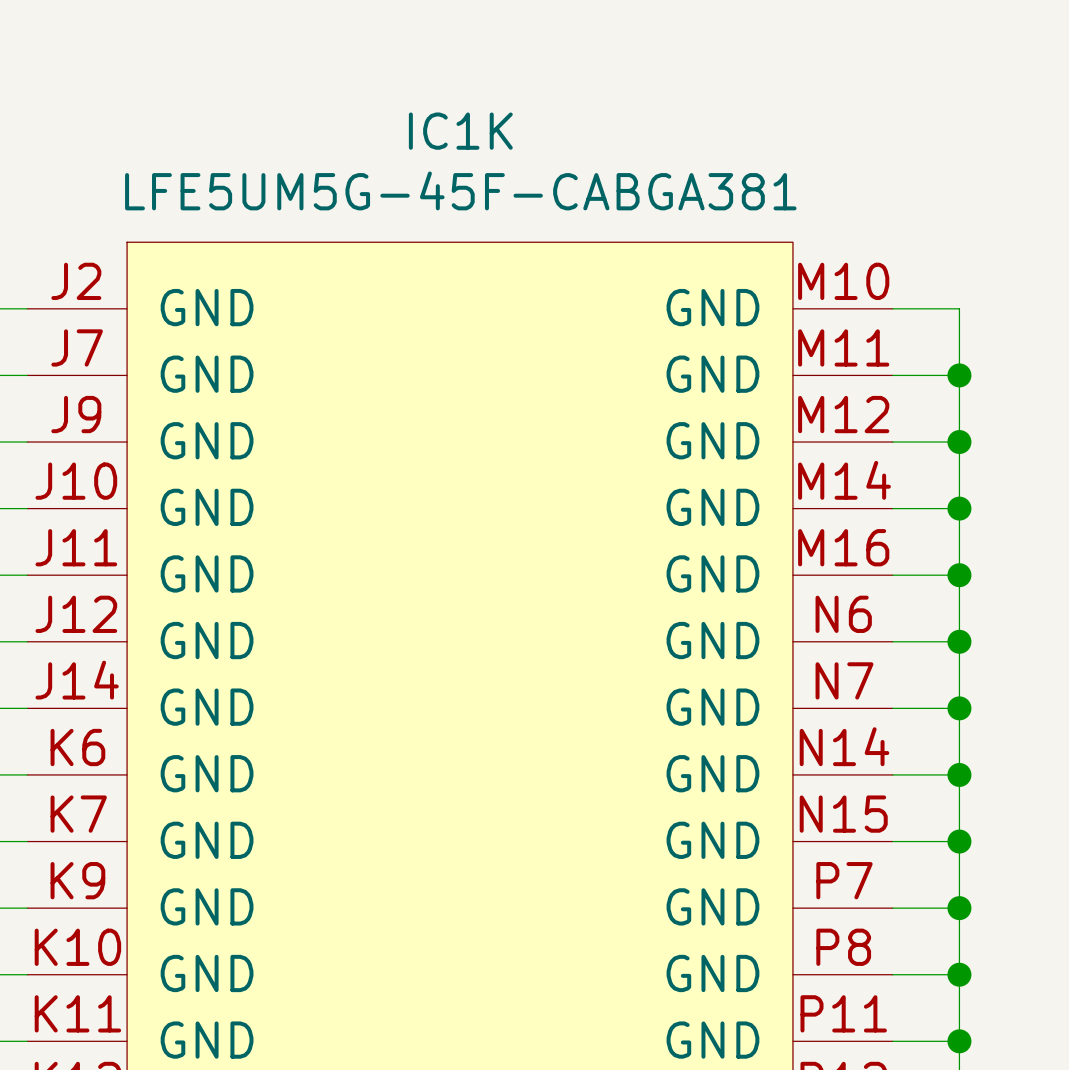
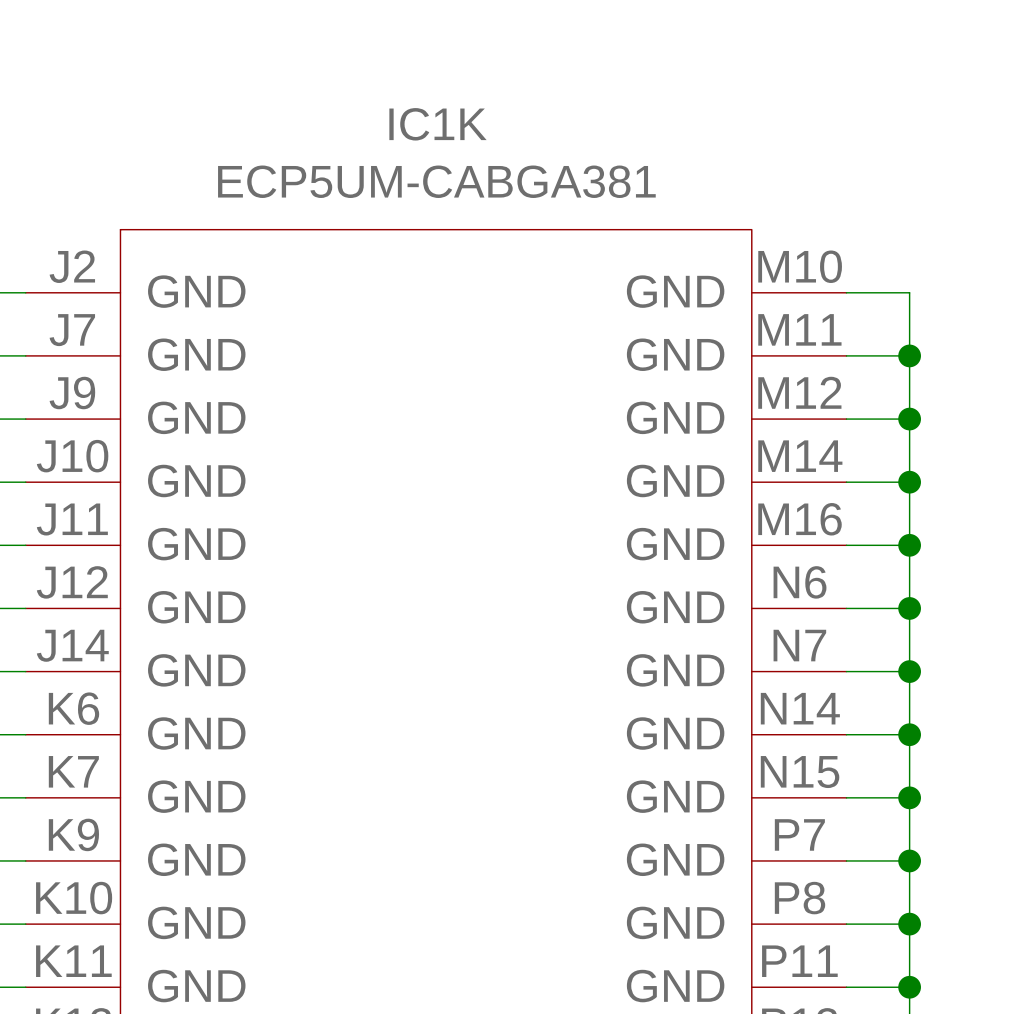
IC1K value: LFE5UM5G-45F-CABGA381 (460, 190) -> ECP5UM-CABGA381 (436, 181)

